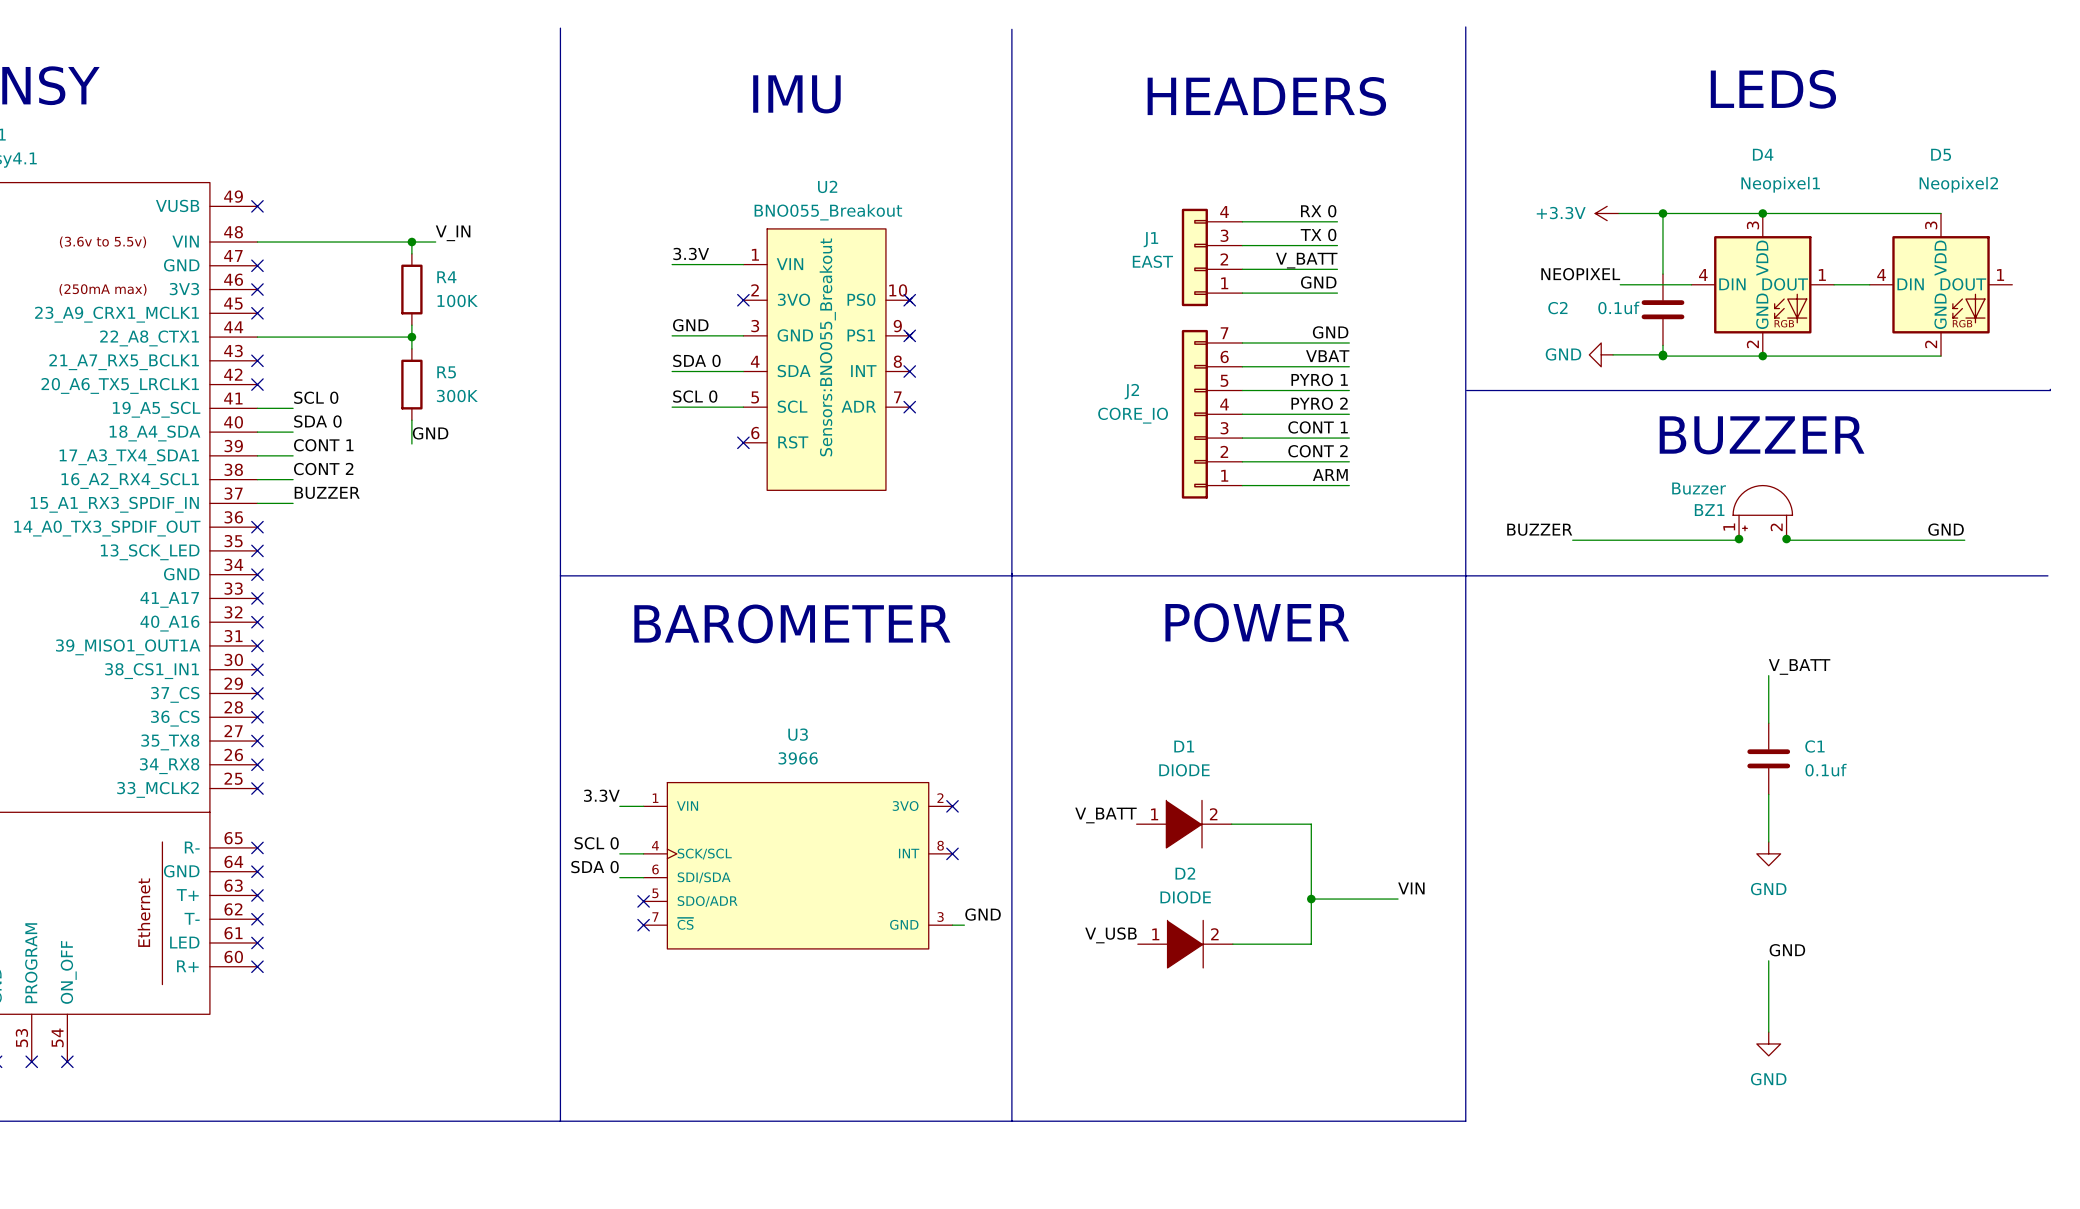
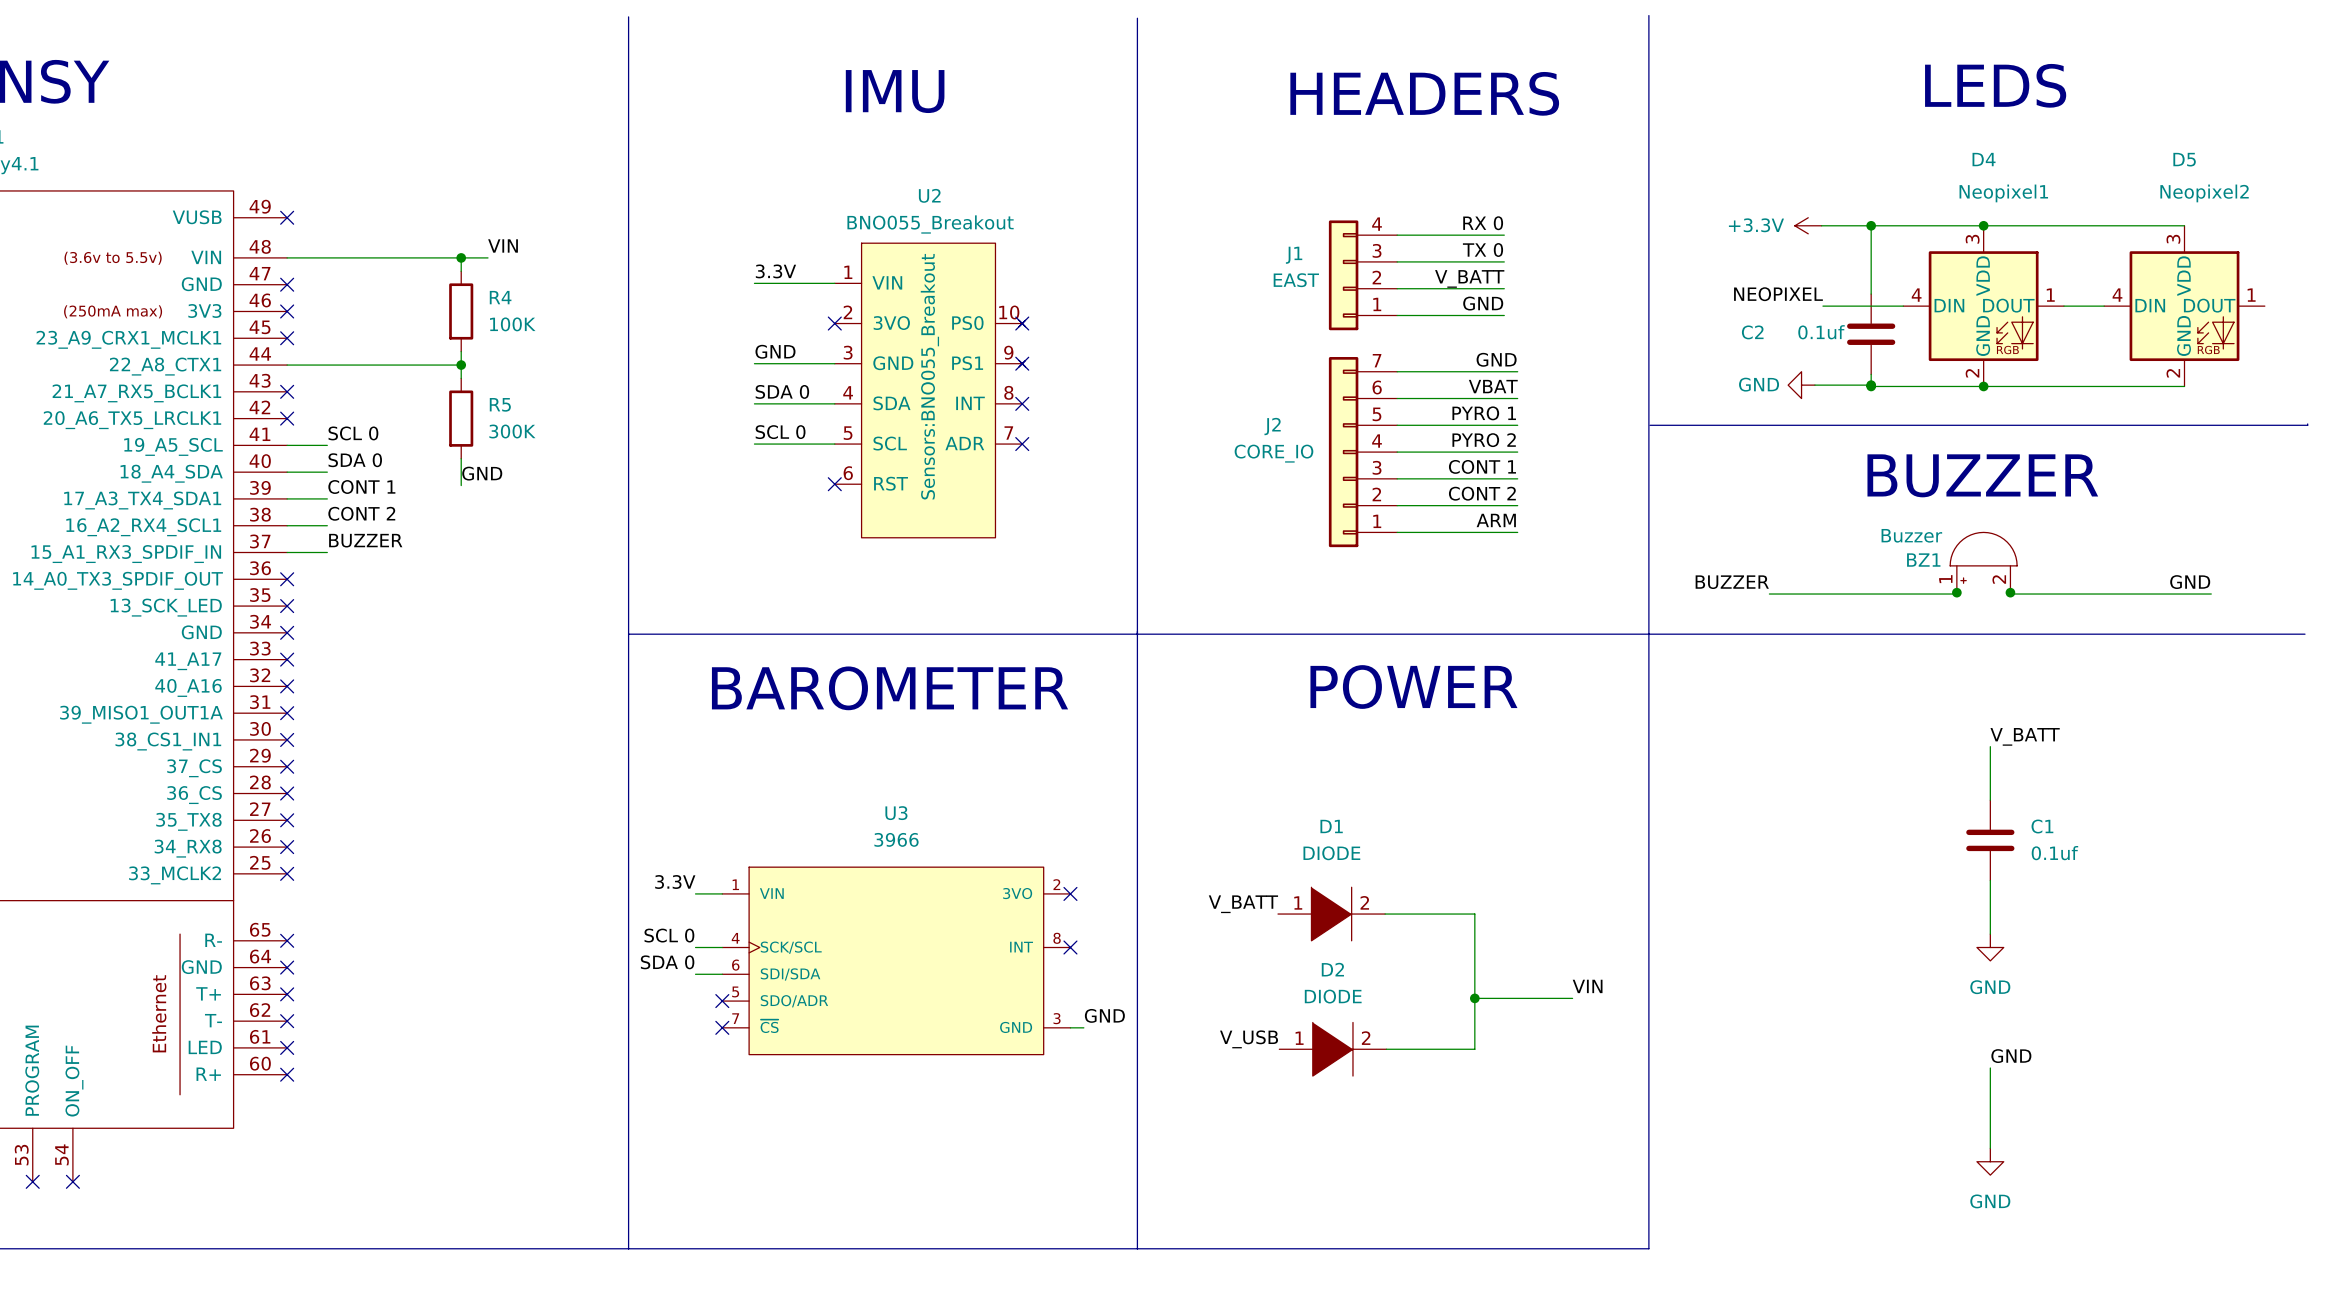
label: V_IN (453, 233) -> VIN (503, 245)

